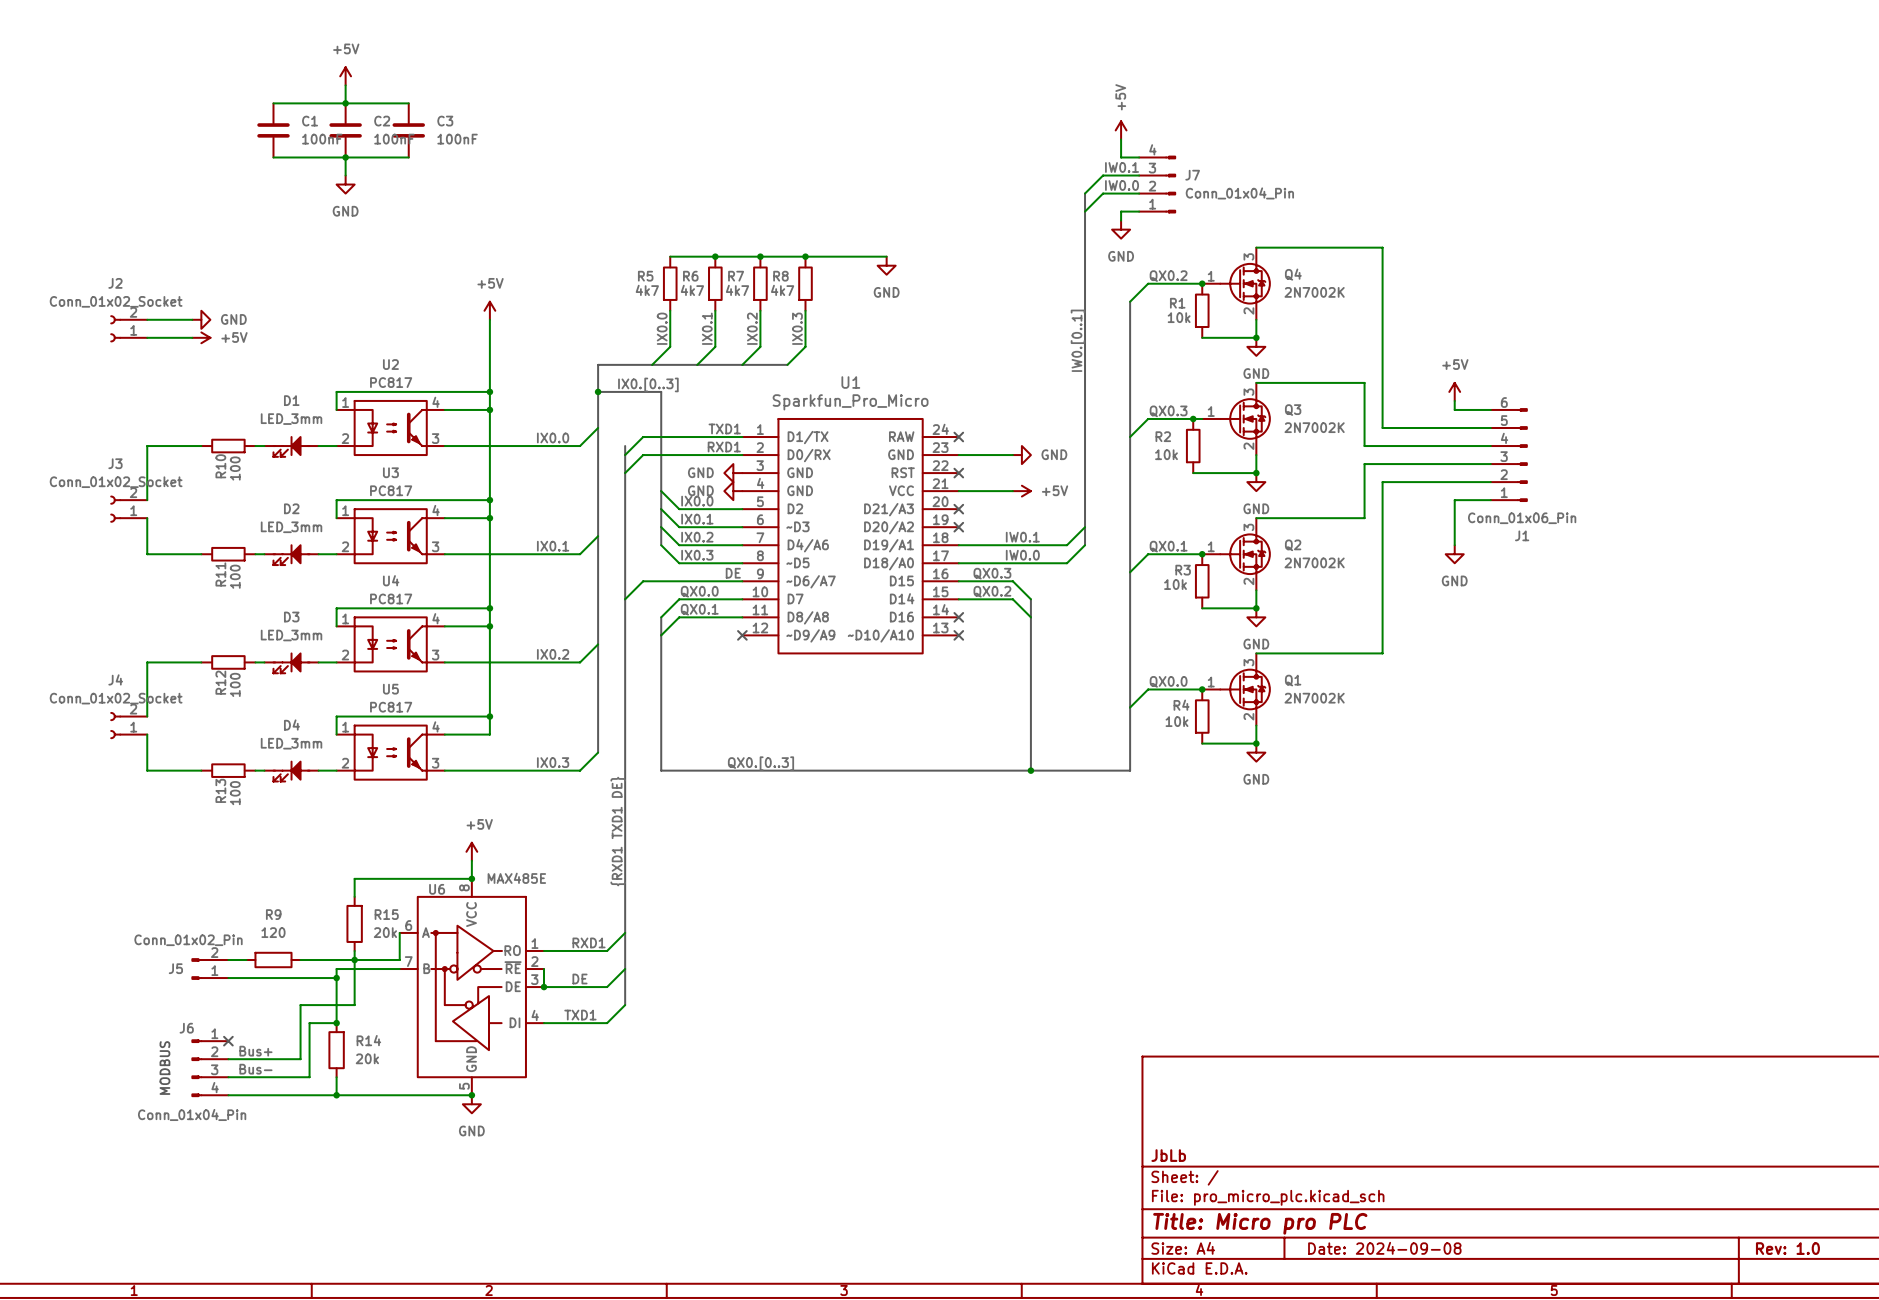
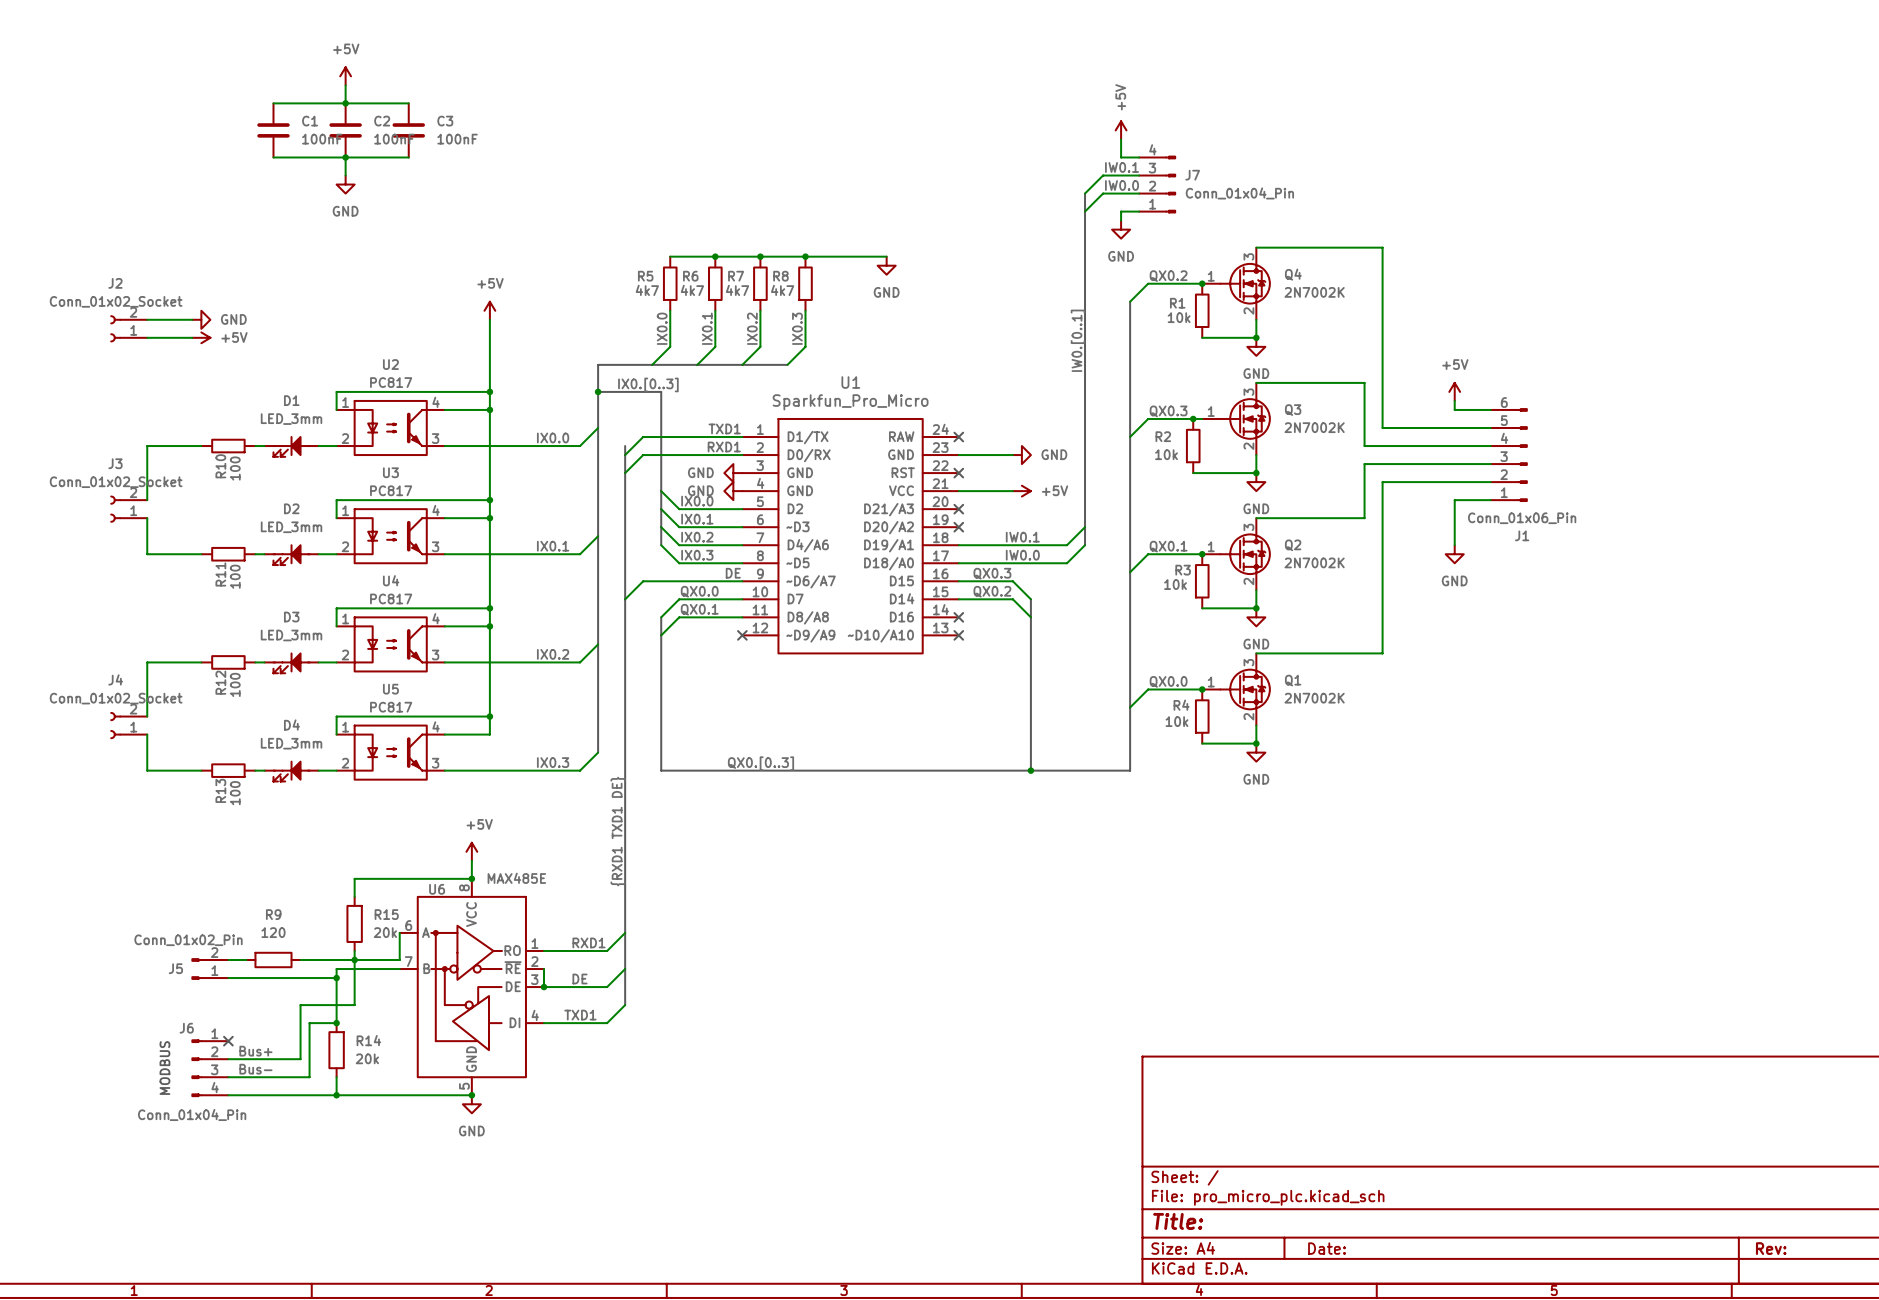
title block: JbLb (1168, 1155) -> none
title block: Title: Micro pro PLC (1260, 1223) -> Title: (1178, 1221)
title block: Date: 2024-09-08 (1384, 1248) -> Date: (1327, 1248)
title block: Rev: 1.0 (1787, 1248) -> Rev: (1771, 1248)

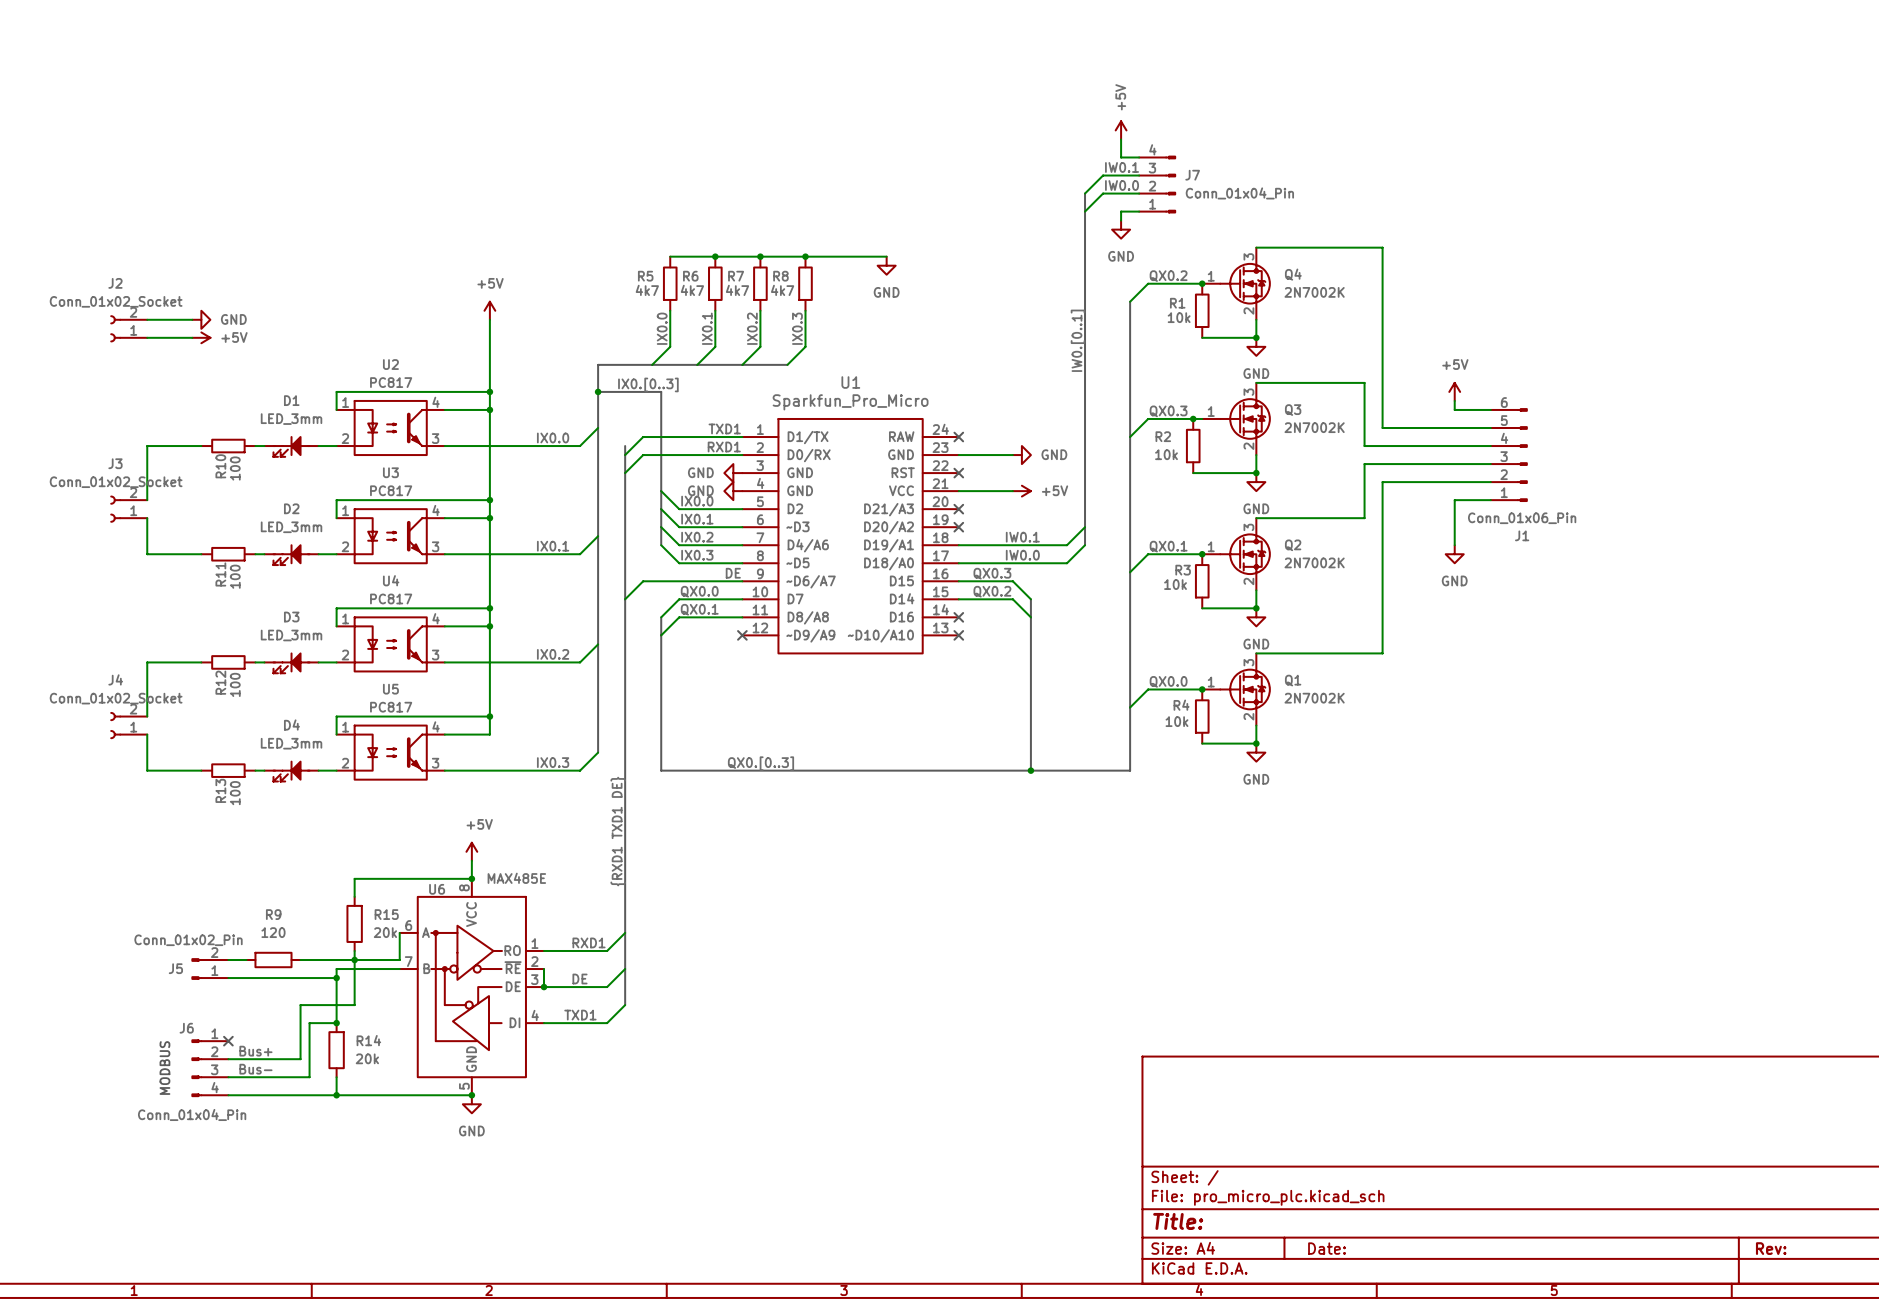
power symbol: +5V (345, 76) -> none
wire: (345, 85) (345, 103) -> none
wire: (273, 103) (408, 103) -> none
junction: (345, 103) -> none
C1: 100nF (273, 130) -> none
C2: 100nF (345, 130) -> none
C3: 100nF (408, 130) -> none
wire: (273, 157) (408, 157) -> none
wire: (345, 157) (345, 175) -> none
junction: (345, 157) -> none
power symbol: GND (345, 184) -> none

